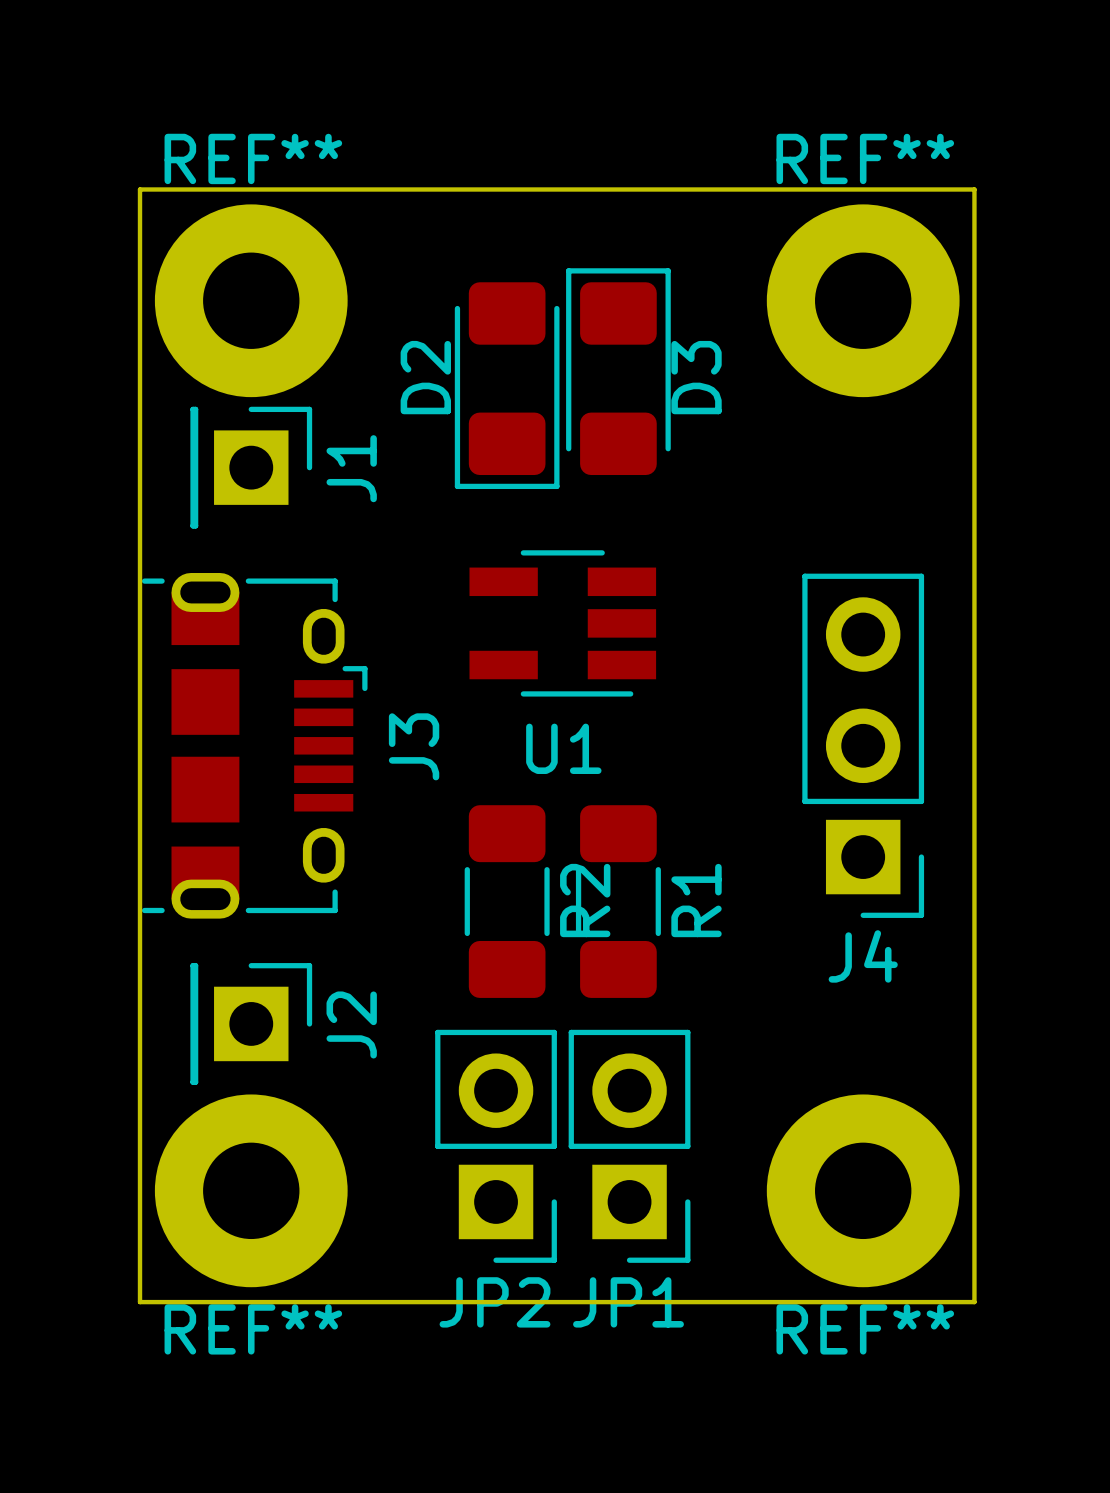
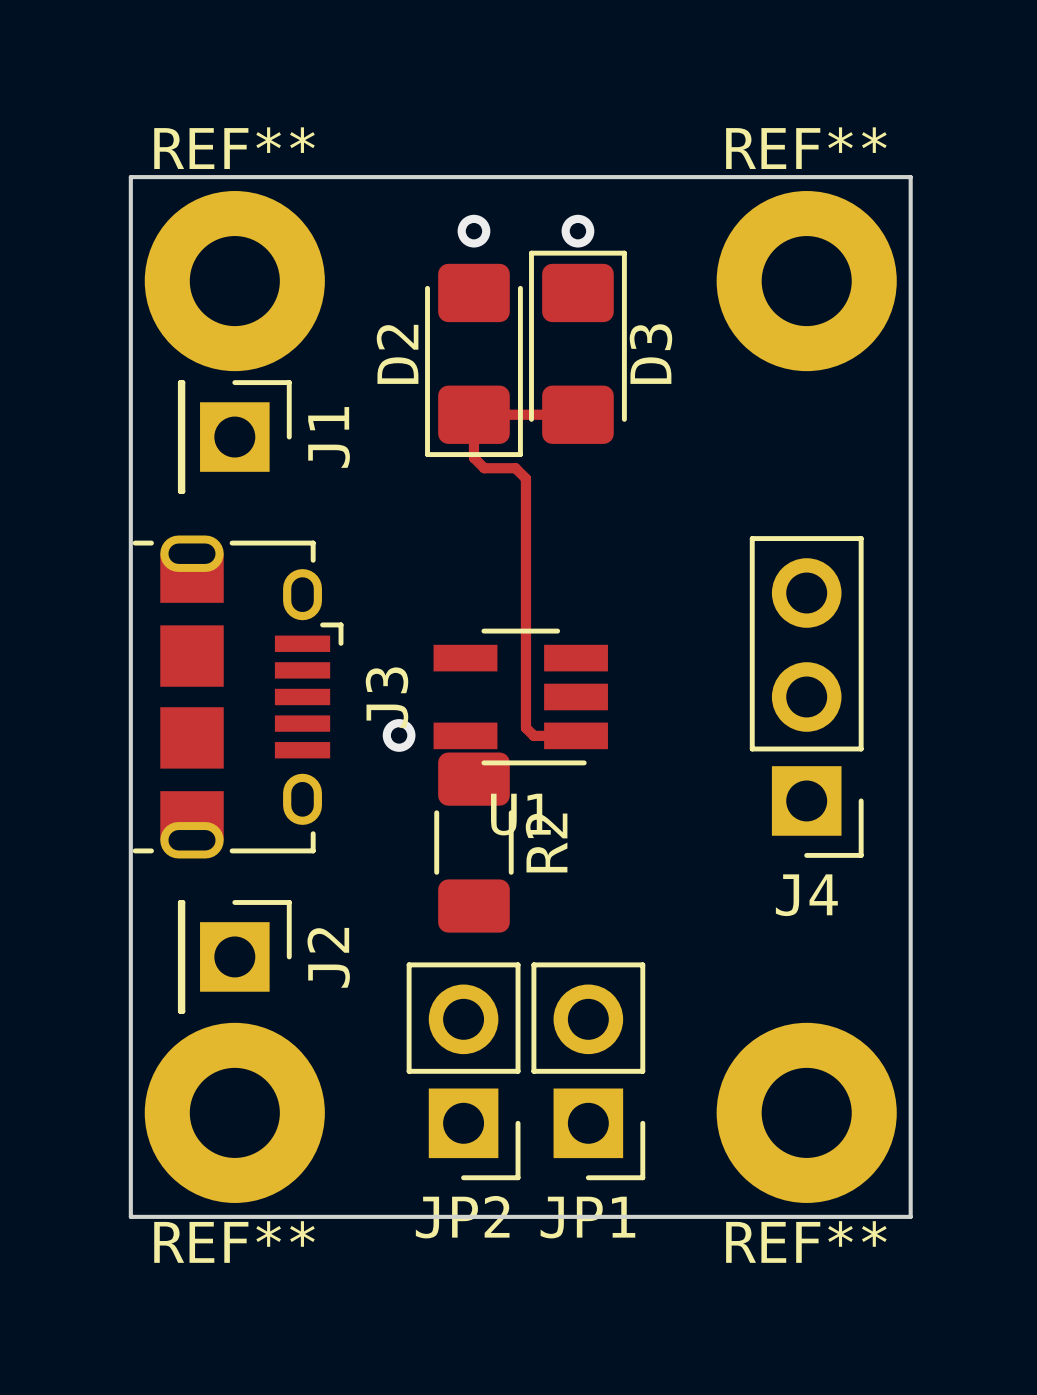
via: none -> (473, 231)
via: none -> (577, 231)
track: none -> (577, 414) (473, 414) (473, 457) (484, 468) (515, 468) (525, 478) (525, 727) (533, 735) (576, 735)
U1 position: (562, 623) -> (520, 696)
via: none -> (399, 735)
R1: (618, 901) -> none

